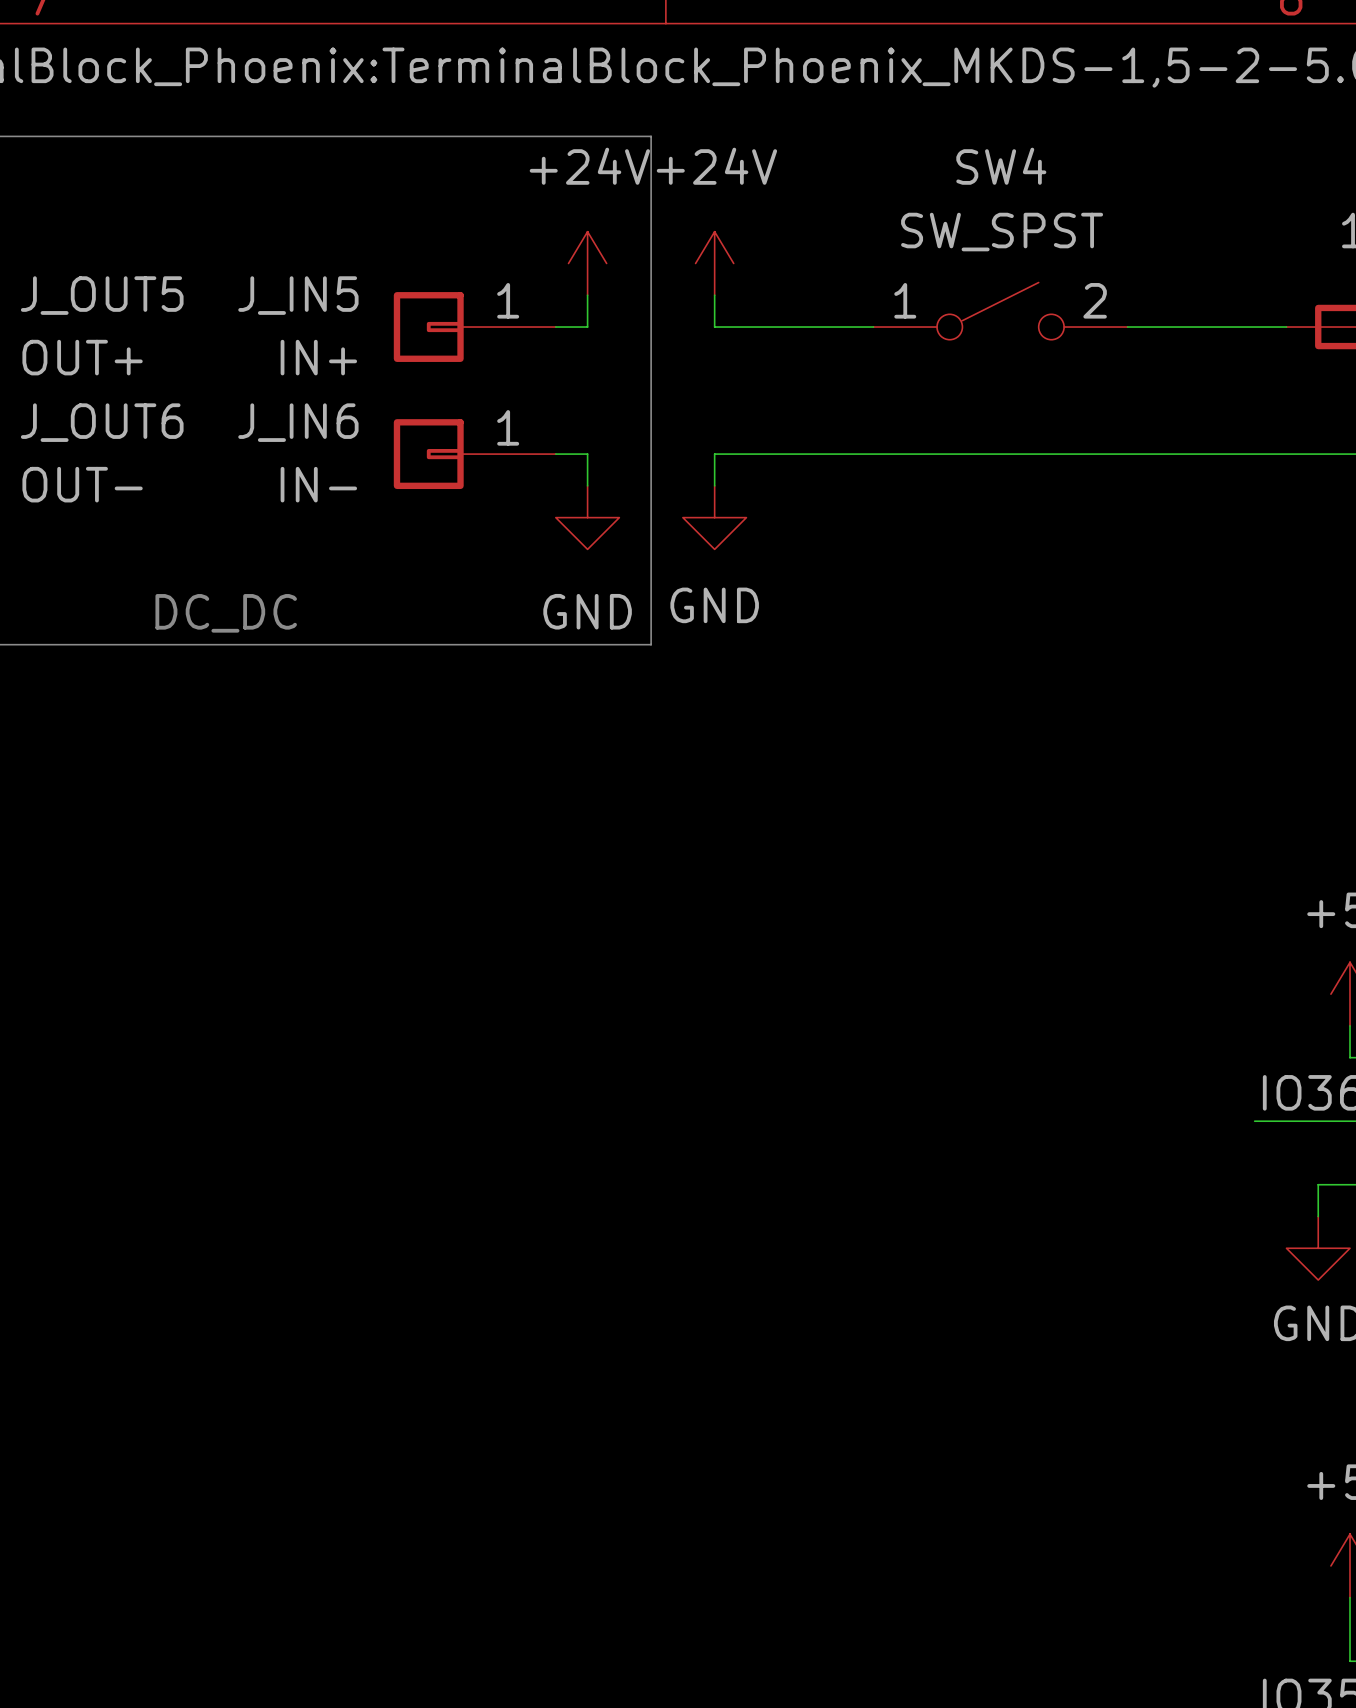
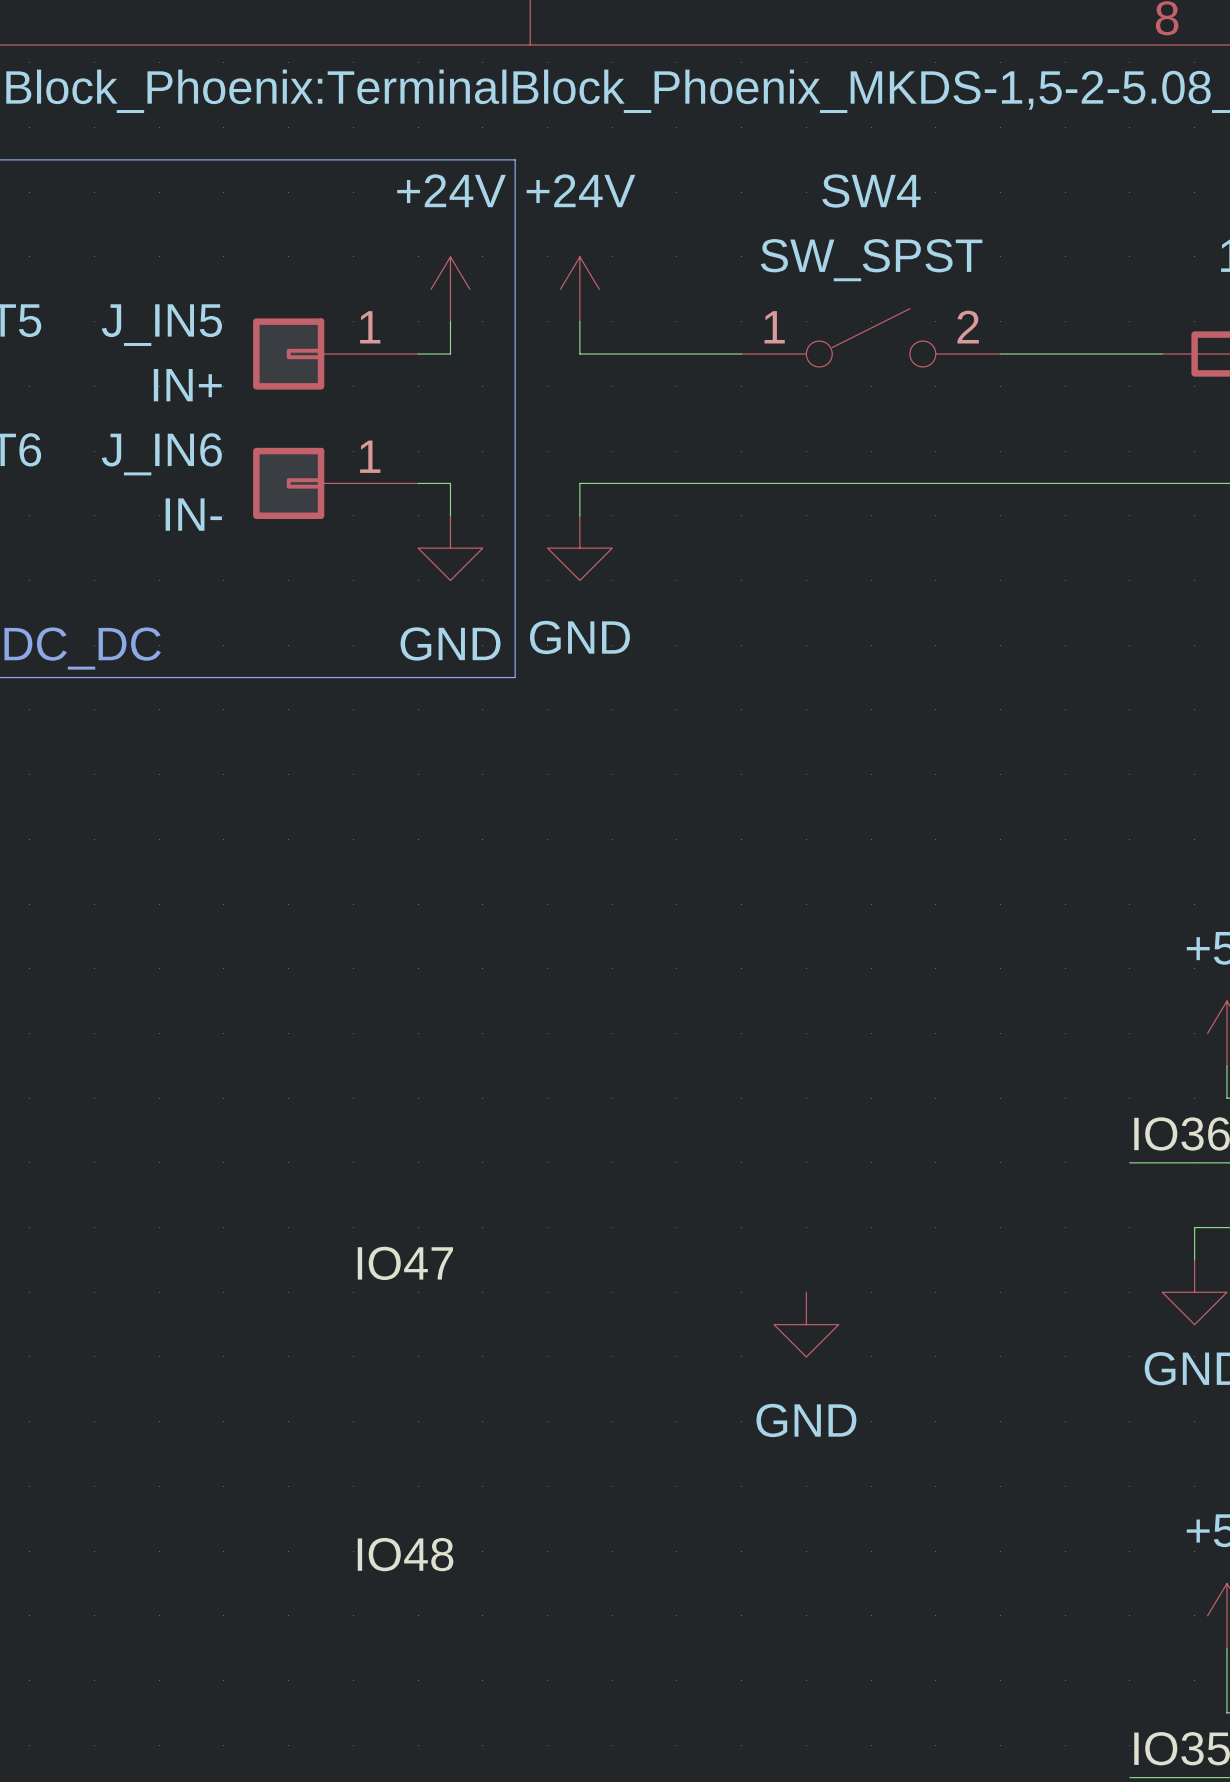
label: none -> IO47 (405, 1263)
power symbol: none -> GND (806, 1324)
label: none -> IO48 (405, 1554)

